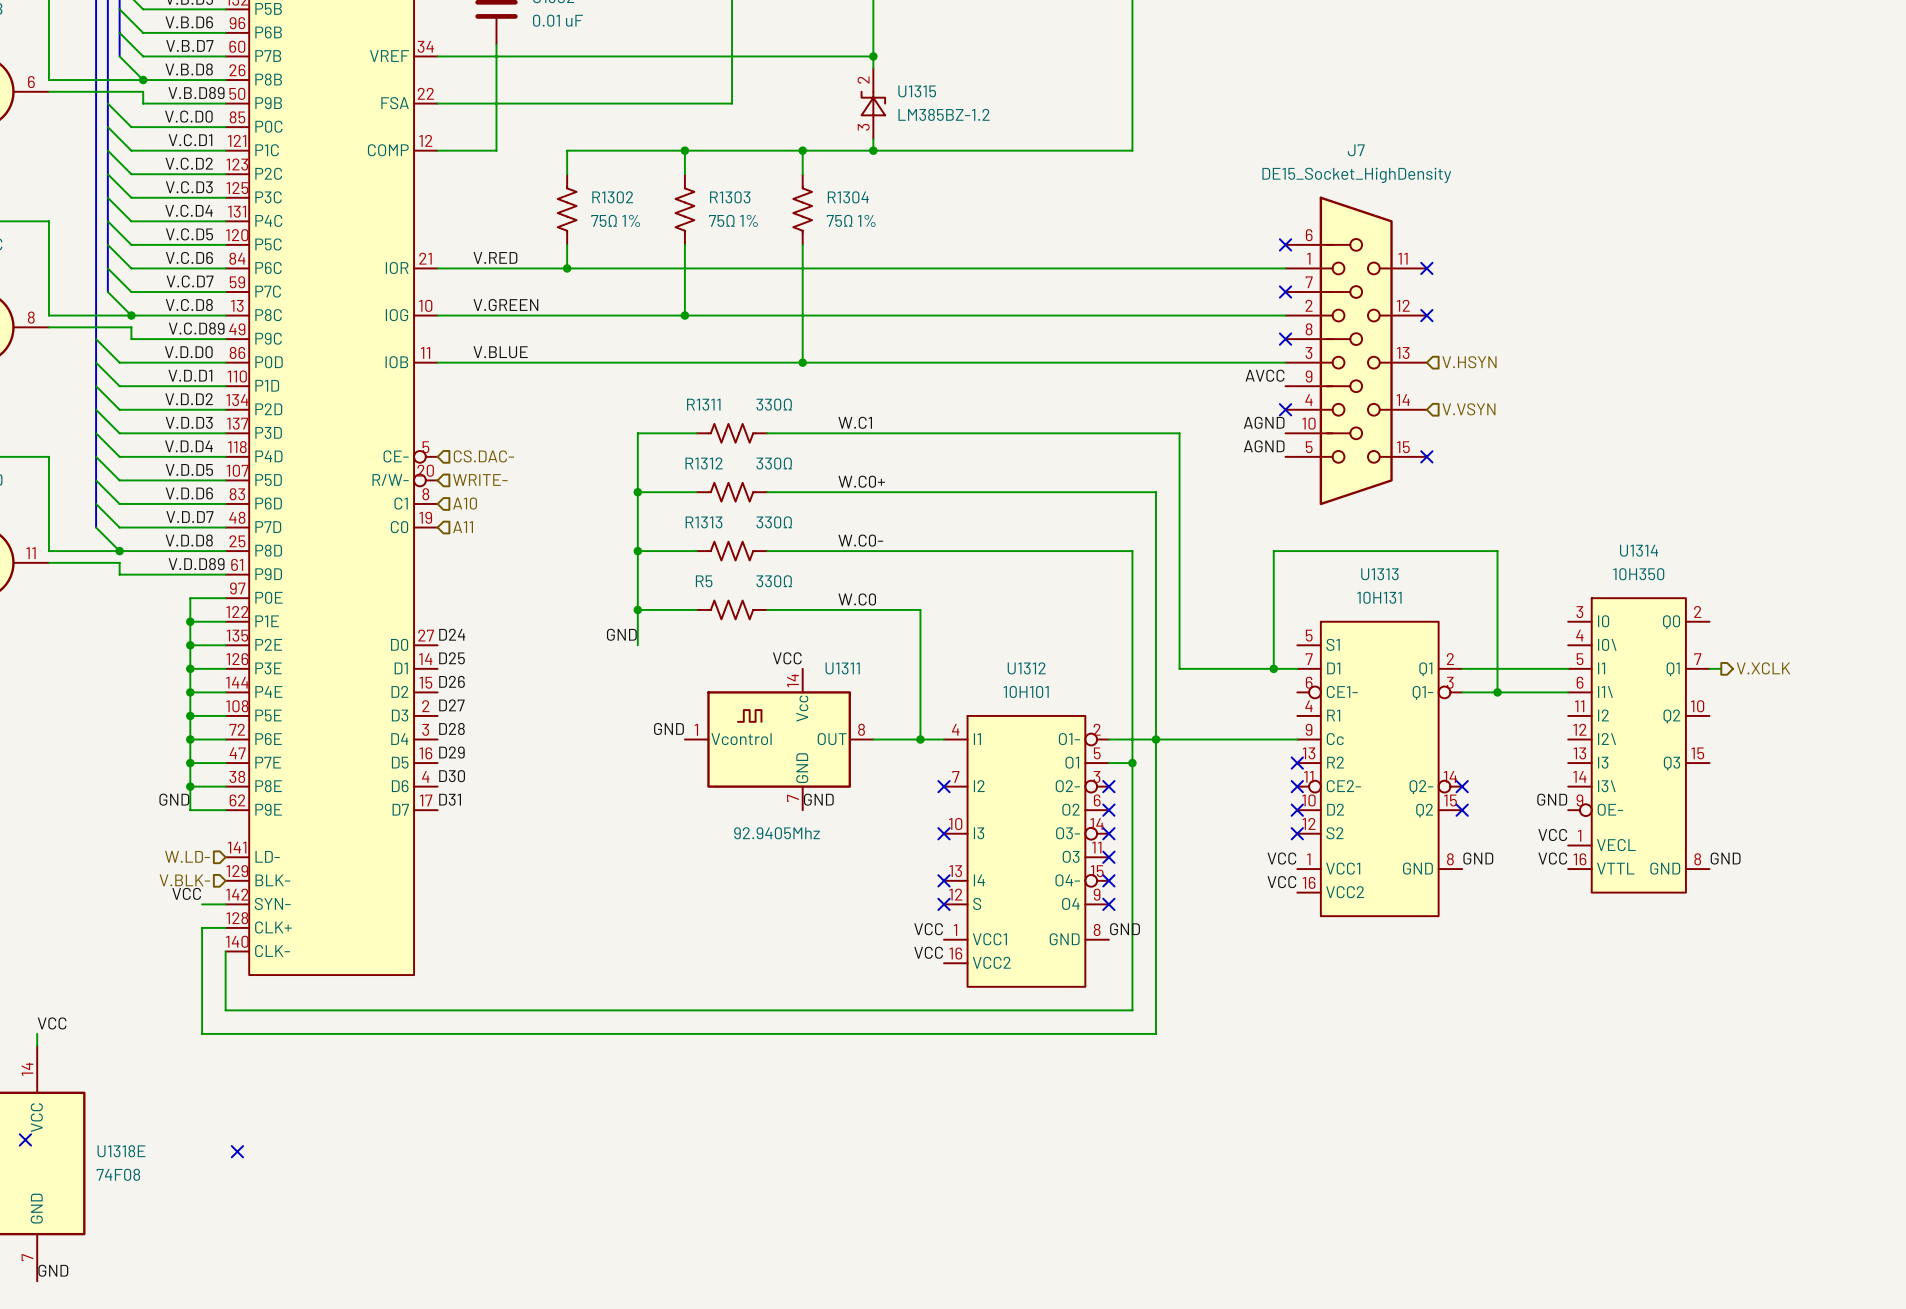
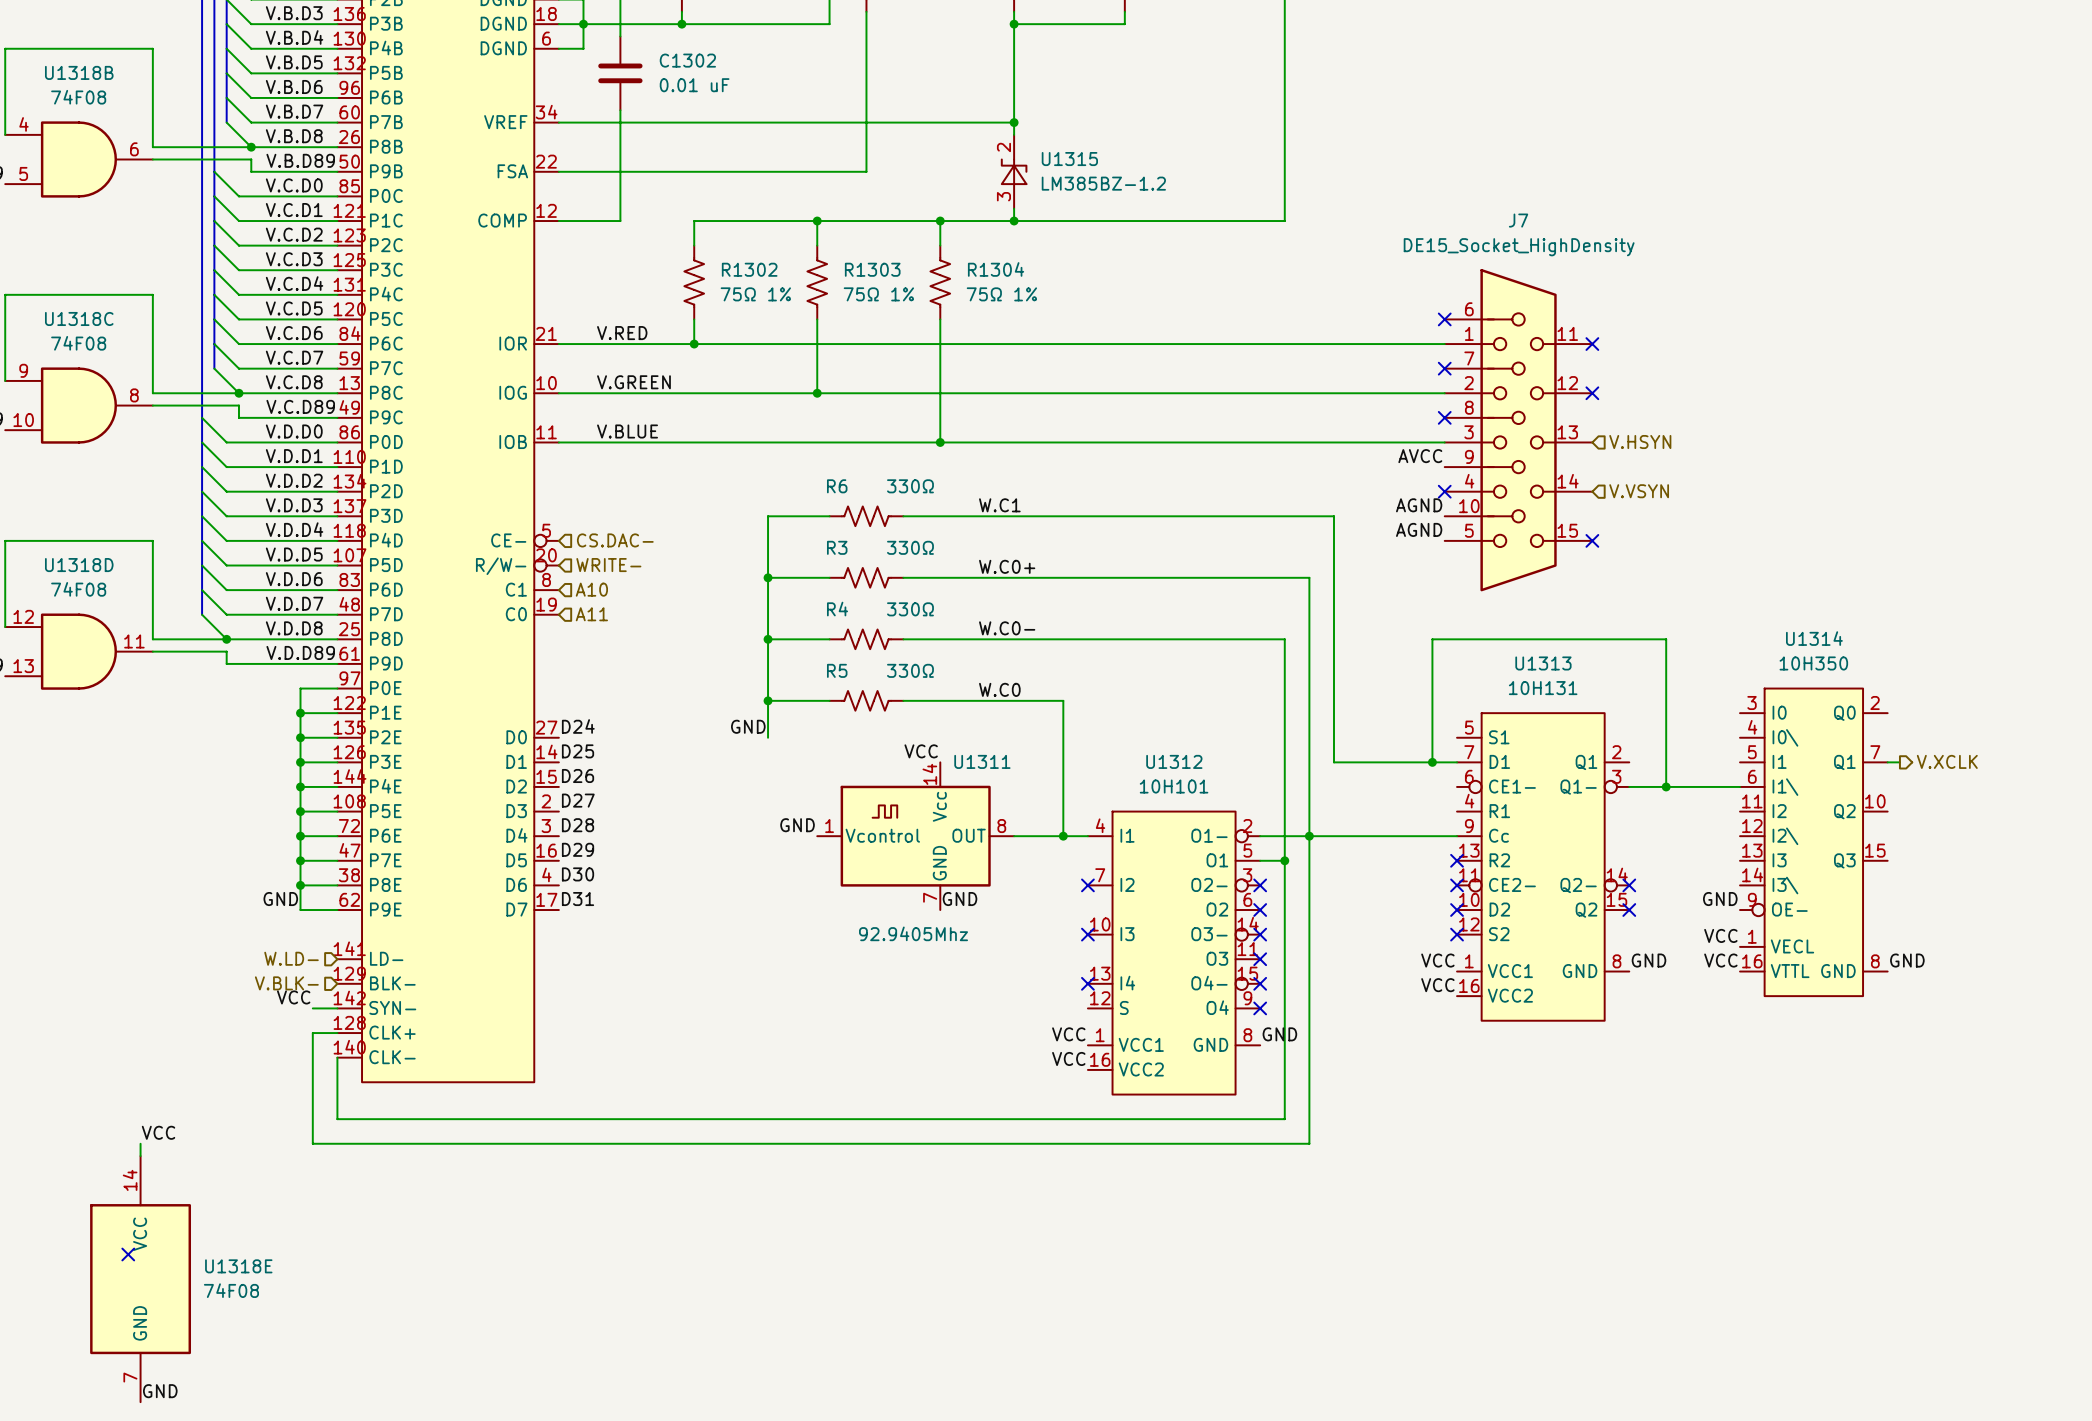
R1311 name: R1311 (703, 404) -> R6 (837, 486)
R1312 name: R1312 (704, 463) -> R3 (837, 547)
R1313 name: R1313 (704, 522) -> R4 (837, 609)
wire: (1462, 668) (1568, 668) -> none
no-connect mark: (944, 904) -> none
no-connect mark: (237, 1151) -> none

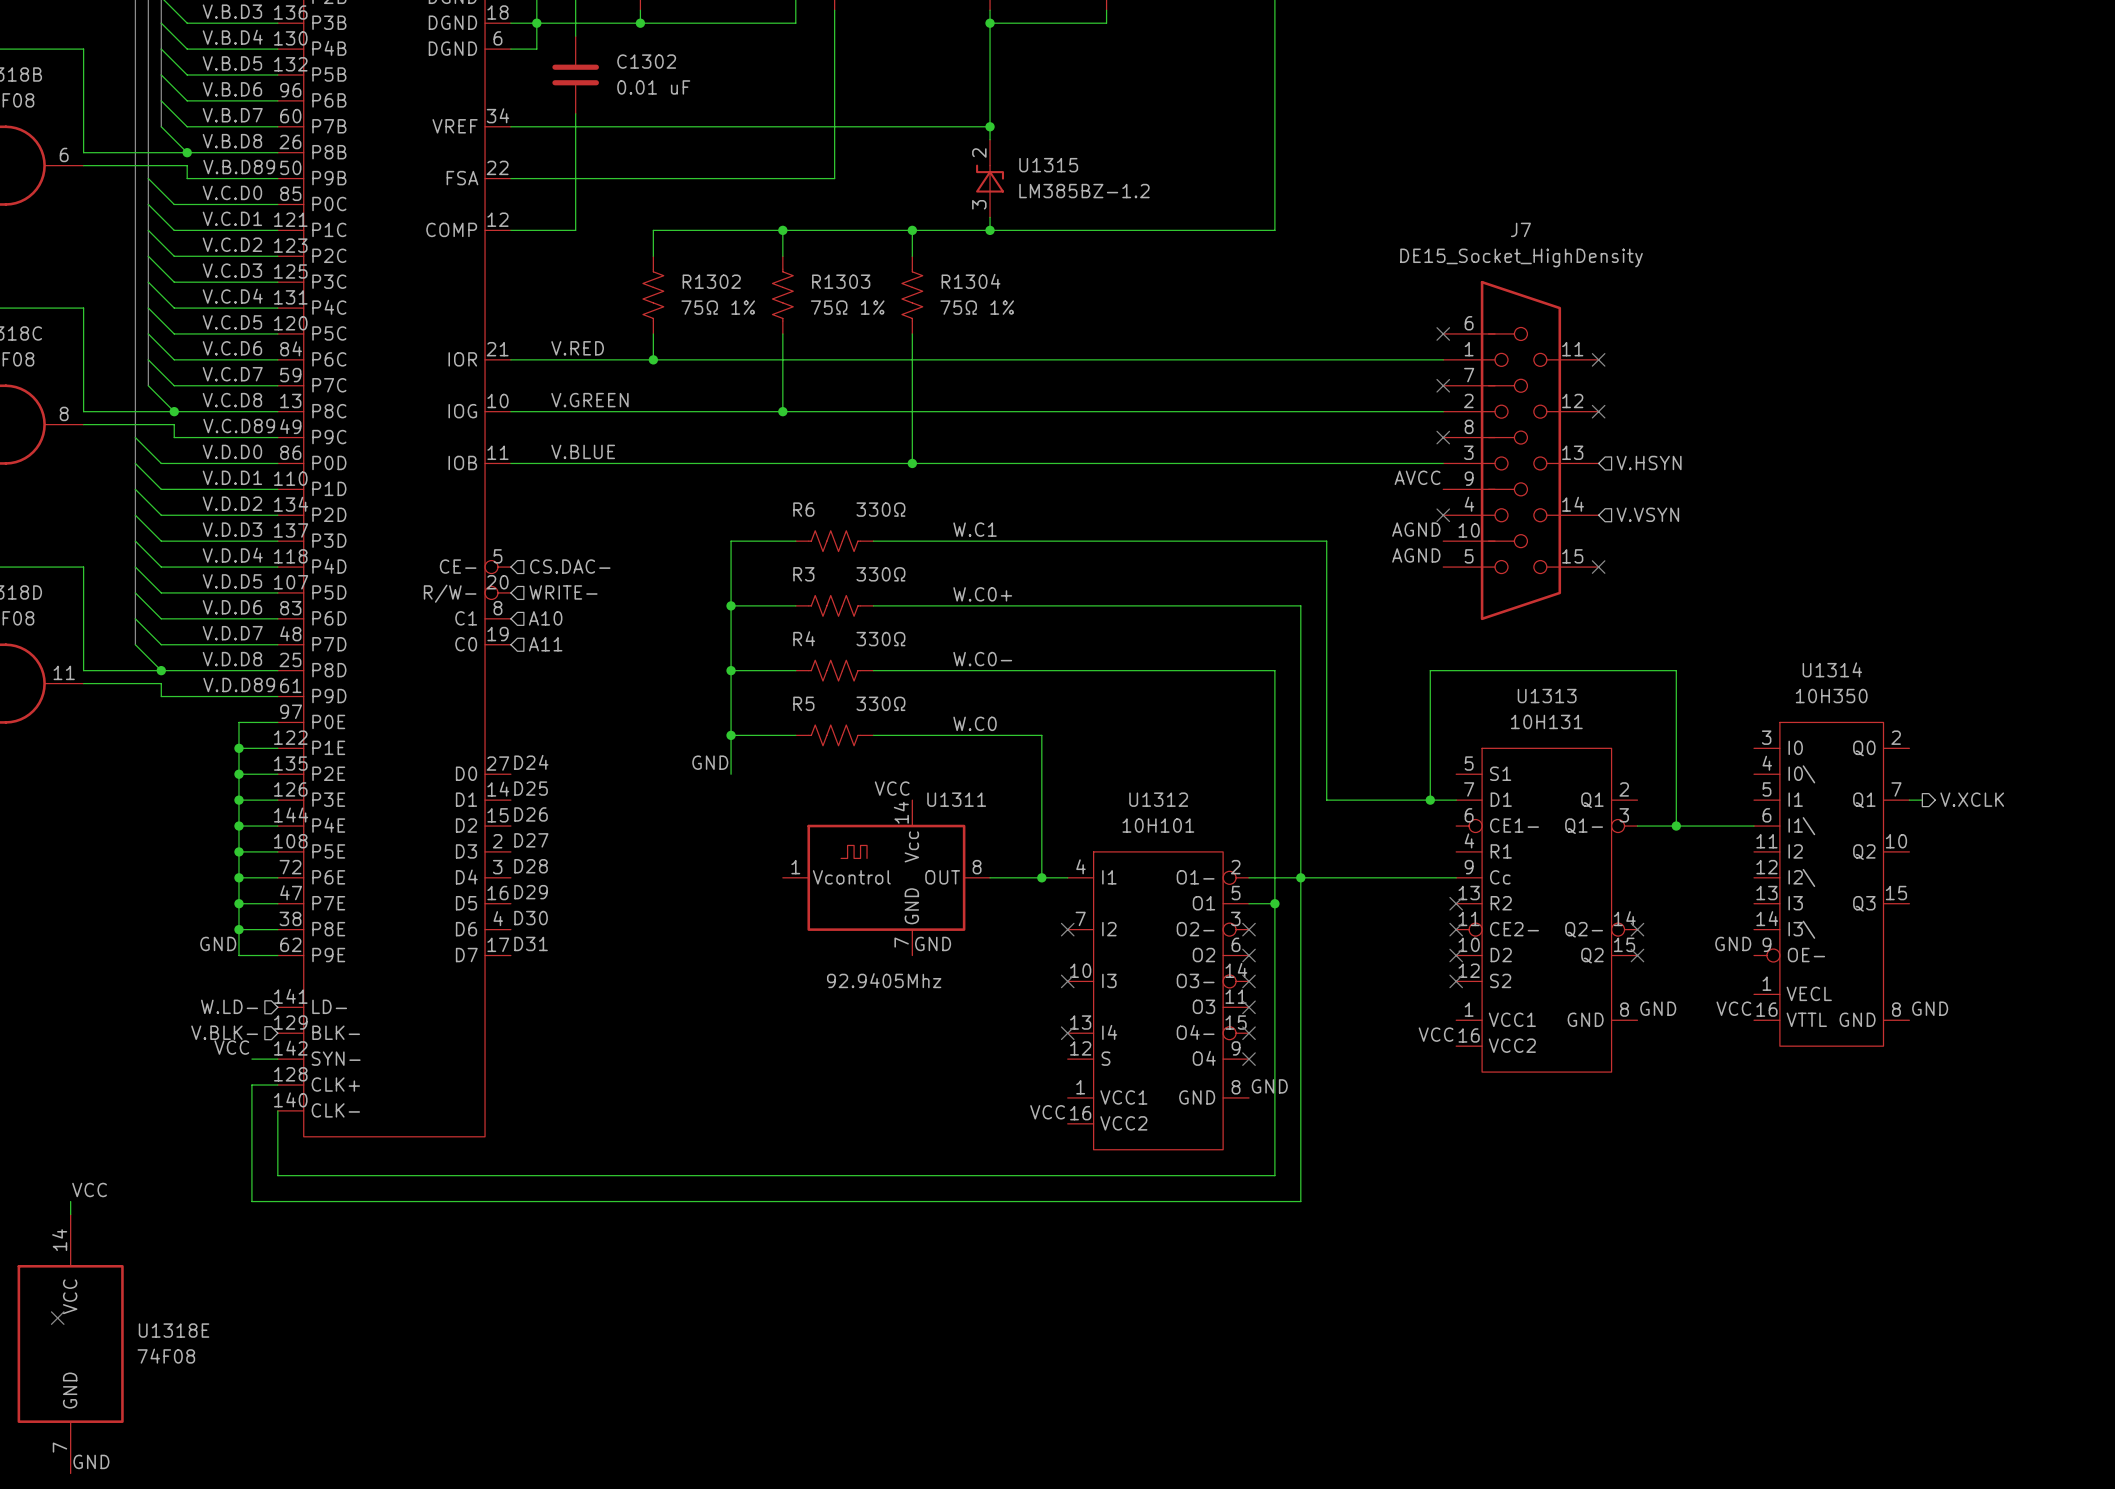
label: GND (797, 825) -> none
label: VCC (1720, 935) -> none
label: VCC (1437, 960) -> none
label: VCC (1068, 1034) -> none

